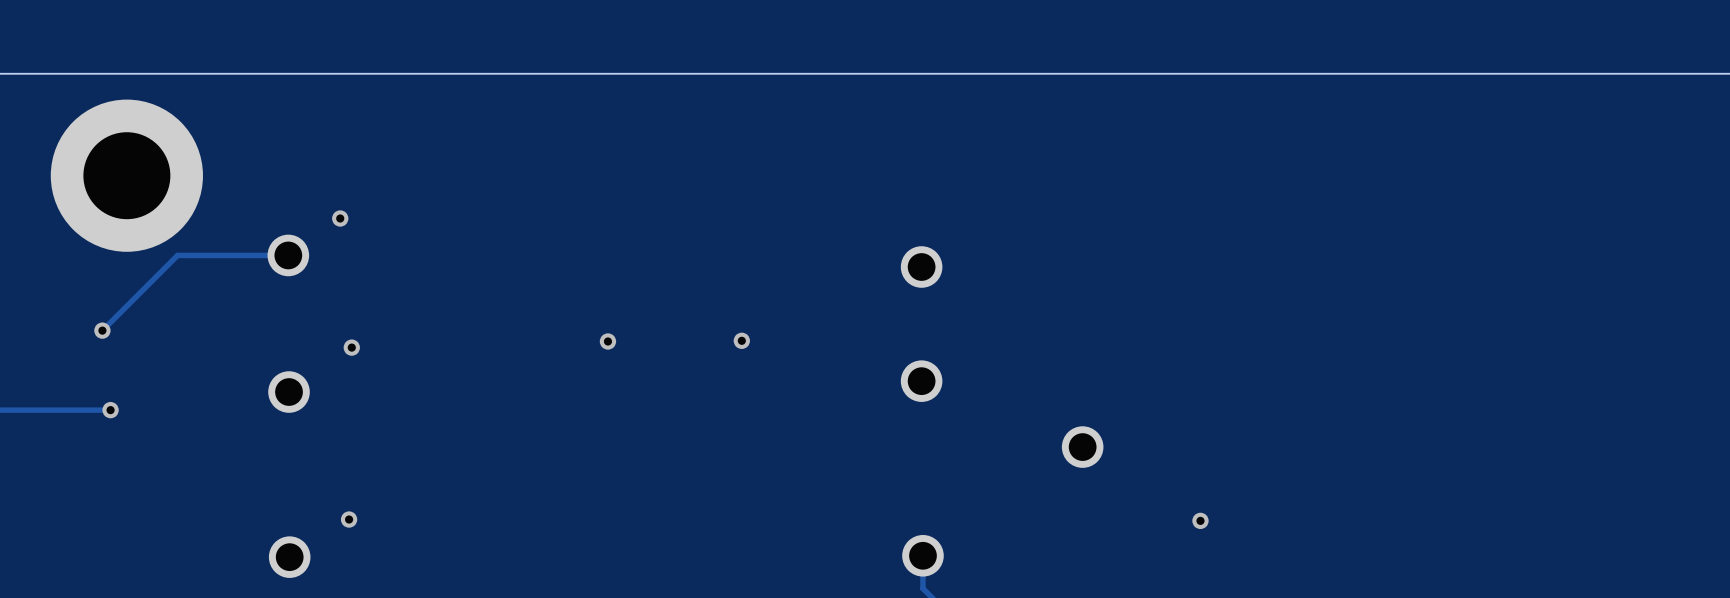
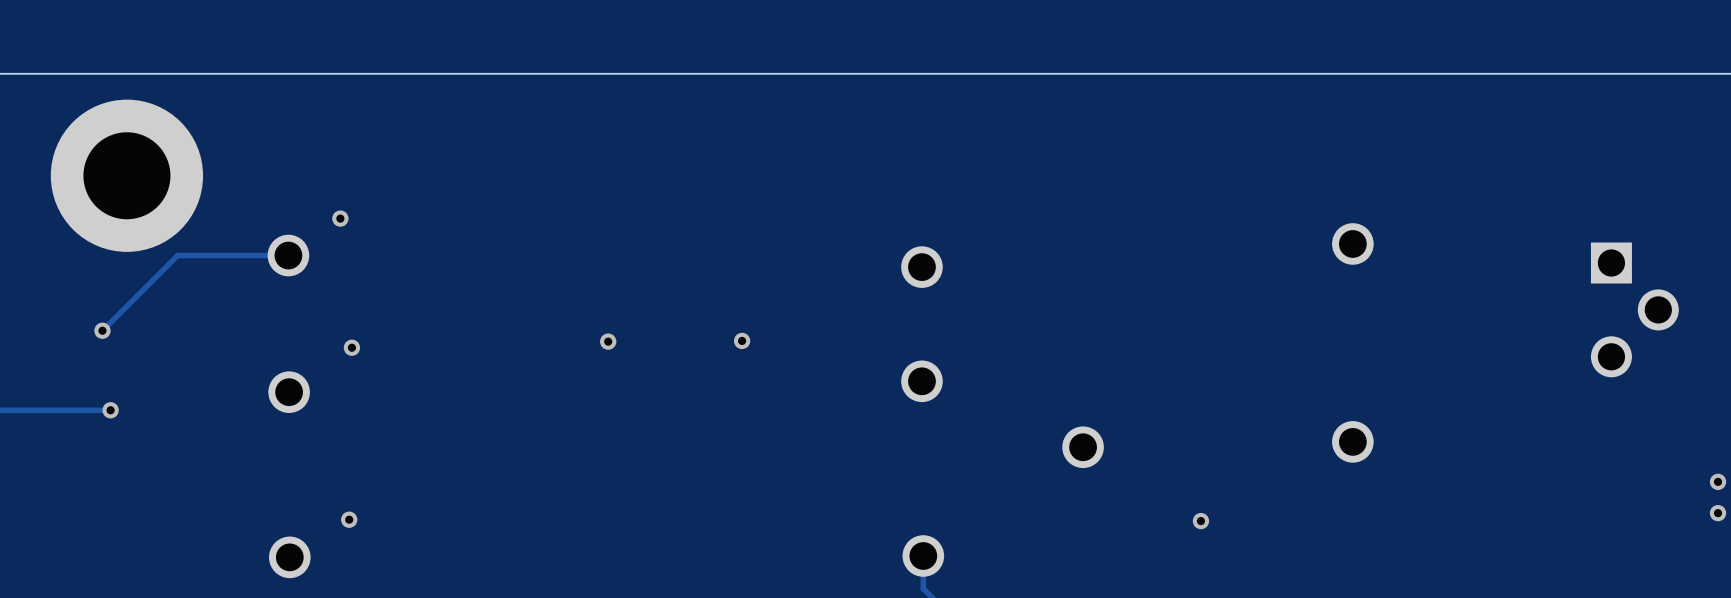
part: none -> (1352, 243)
part: none -> (1634, 309)
part: none -> (1352, 441)
via: none -> (1718, 481)
via: none -> (1718, 513)

